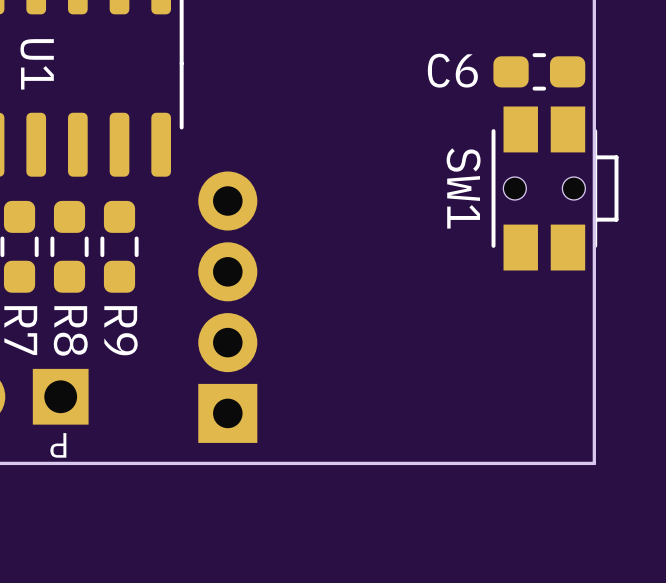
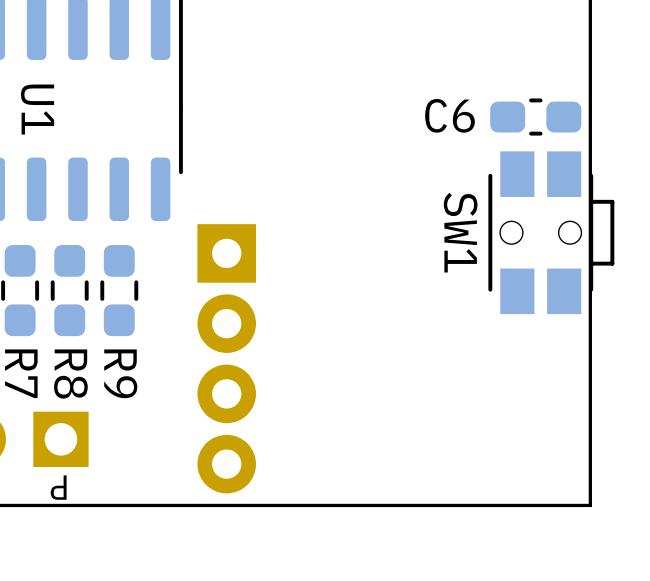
part rotation: 0° (227, 307) -> 180° (226, 358)

